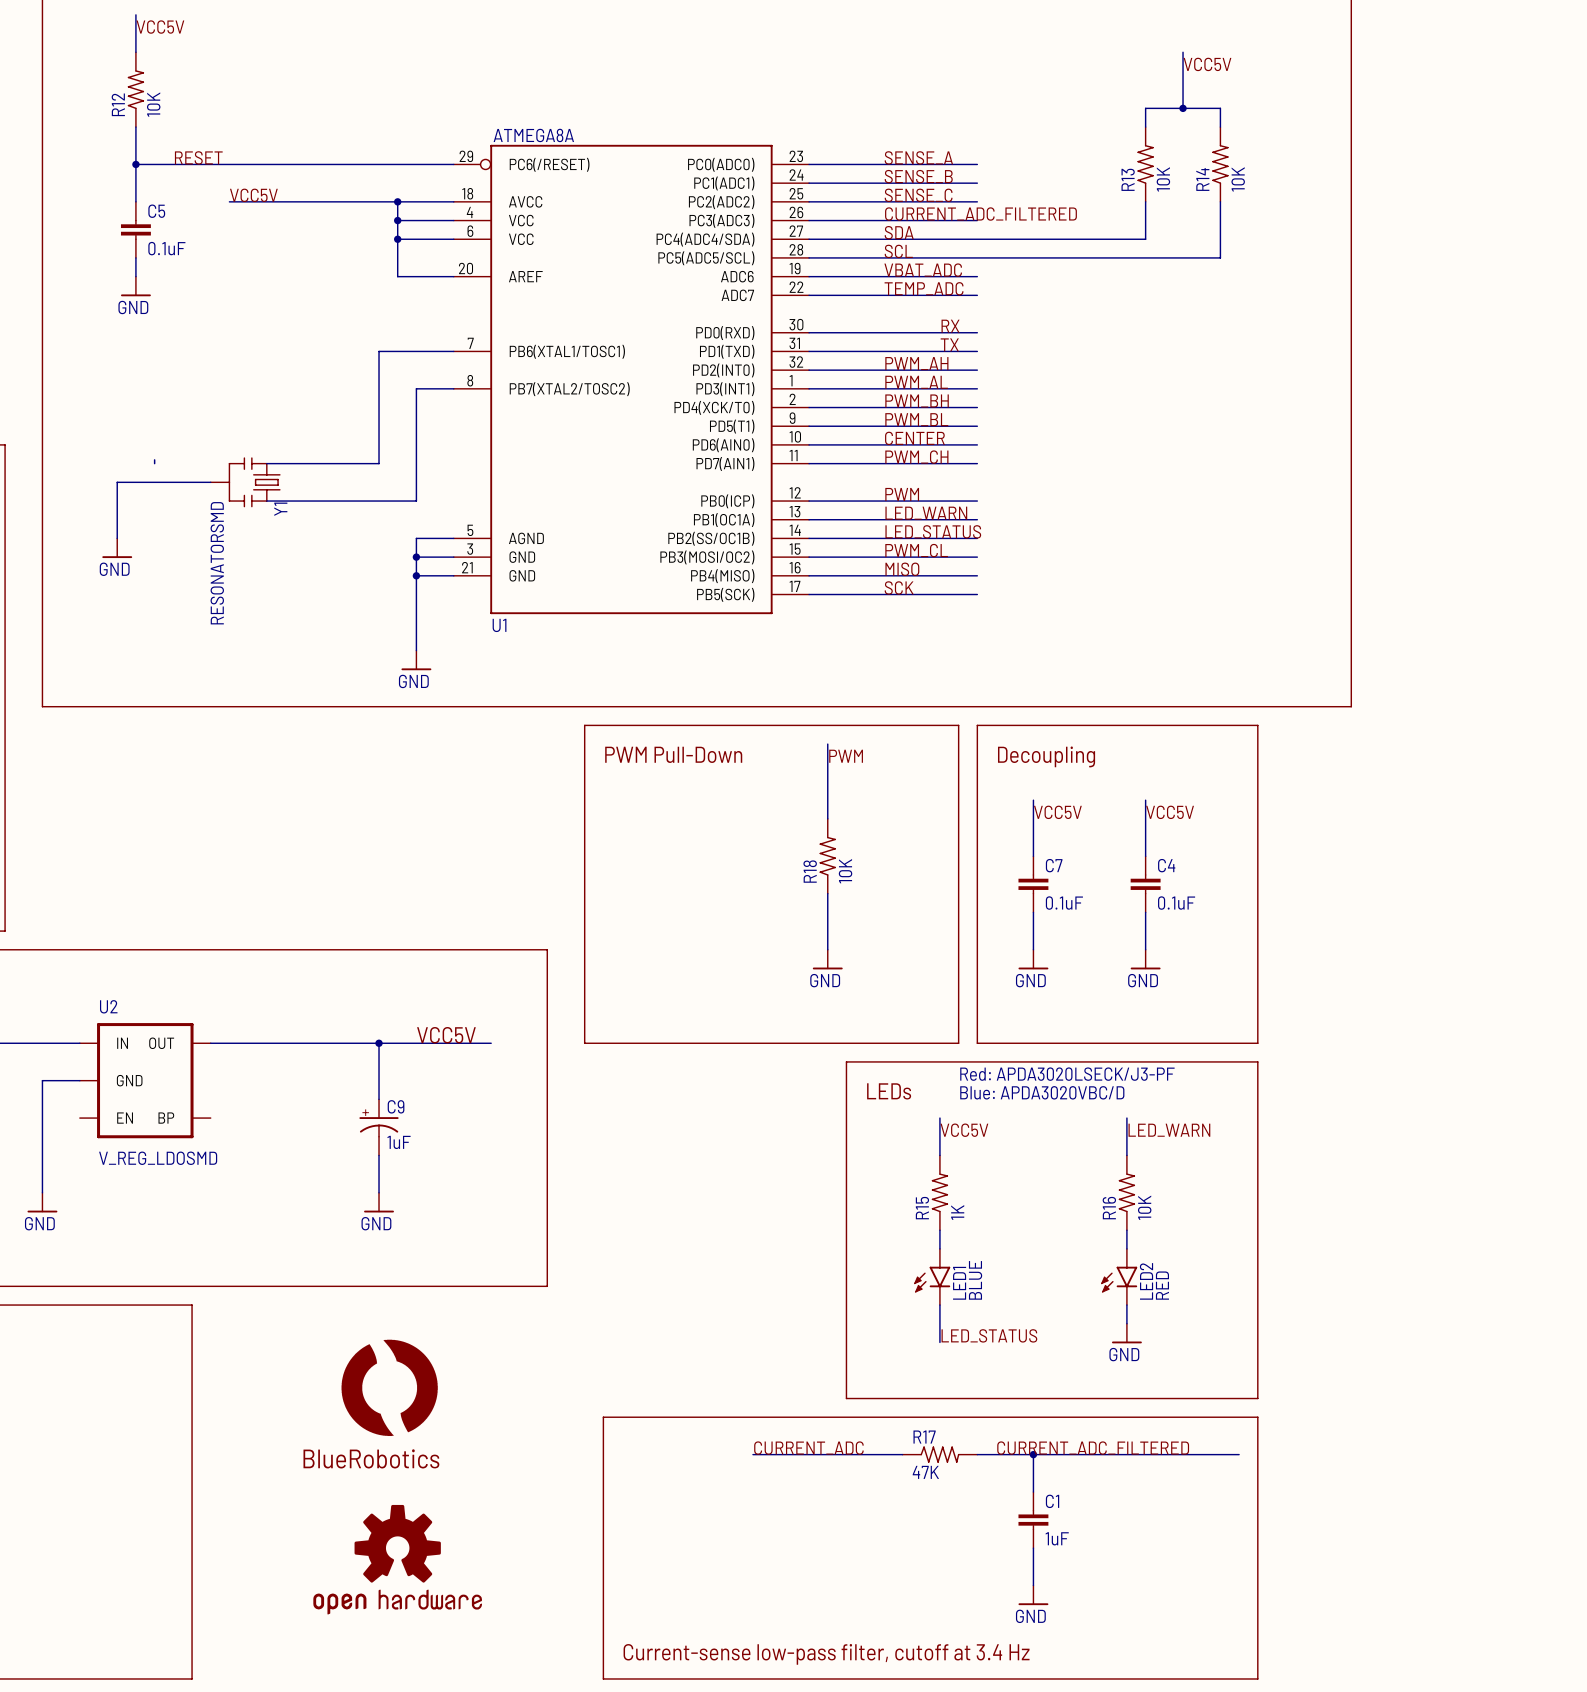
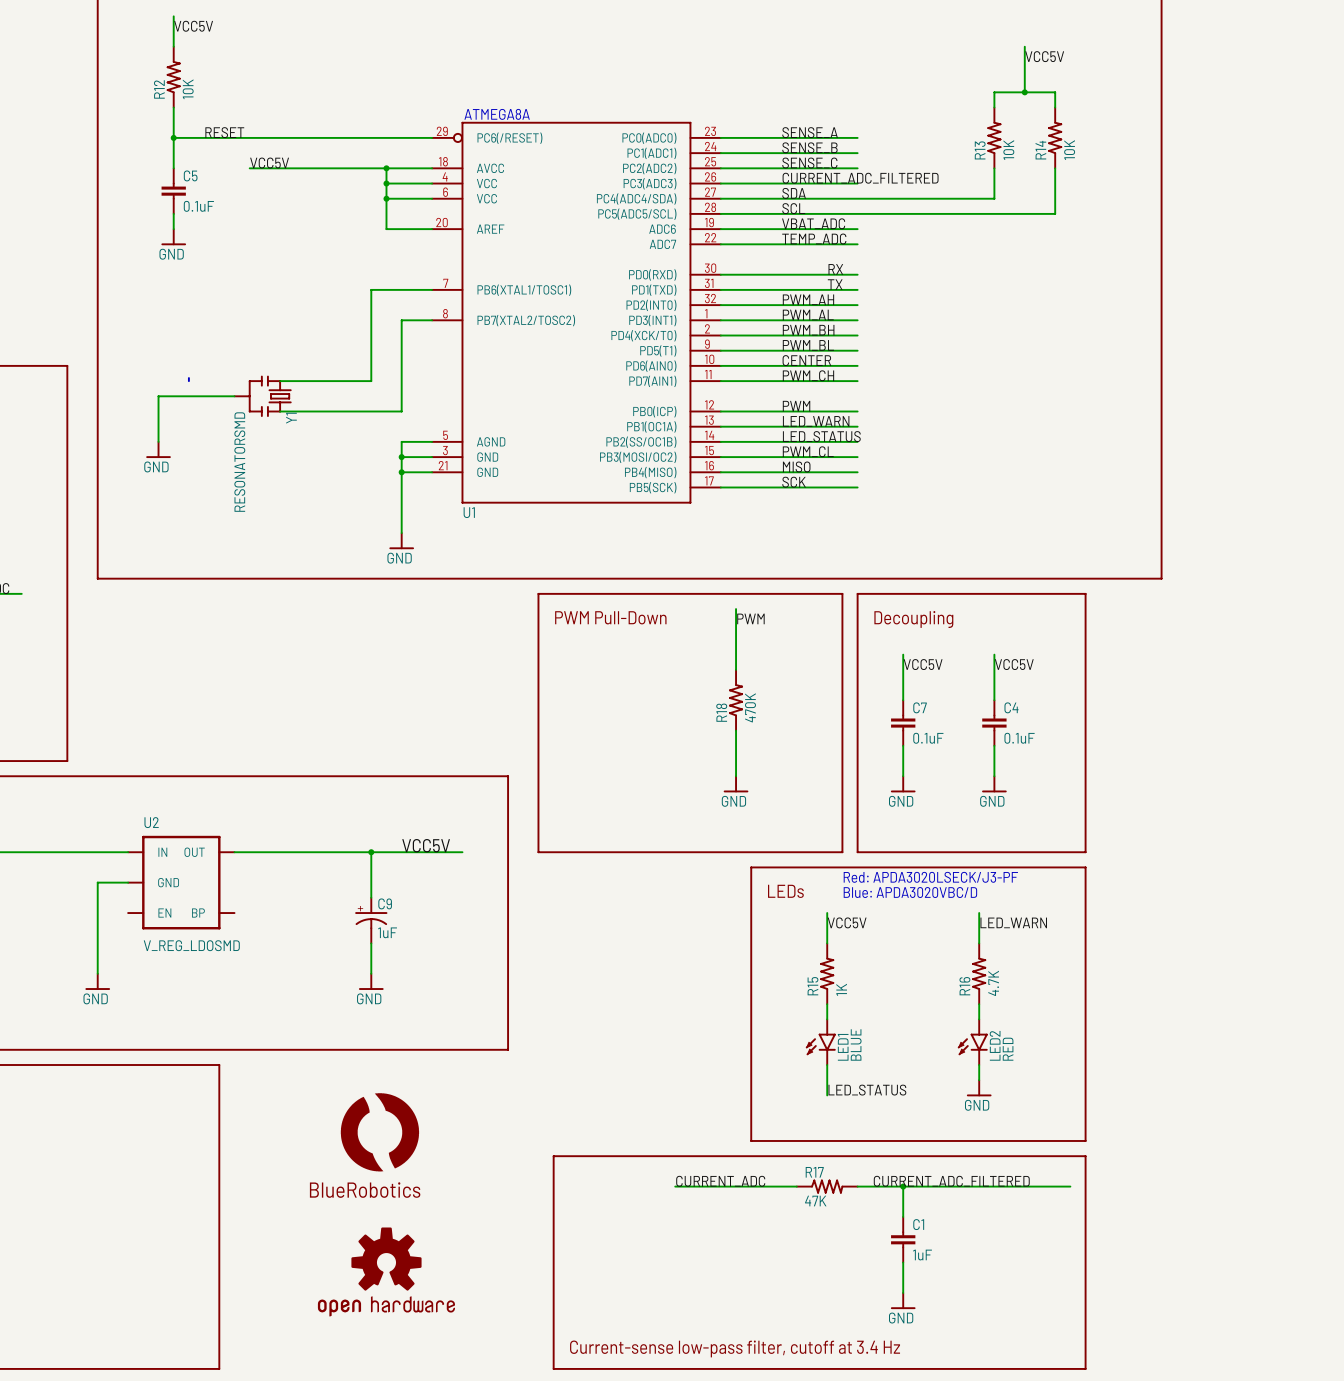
R18 value: 10K (845, 871) -> 470K (750, 707)
R16 value: 10K (1144, 1207) -> 4.7K (993, 983)

